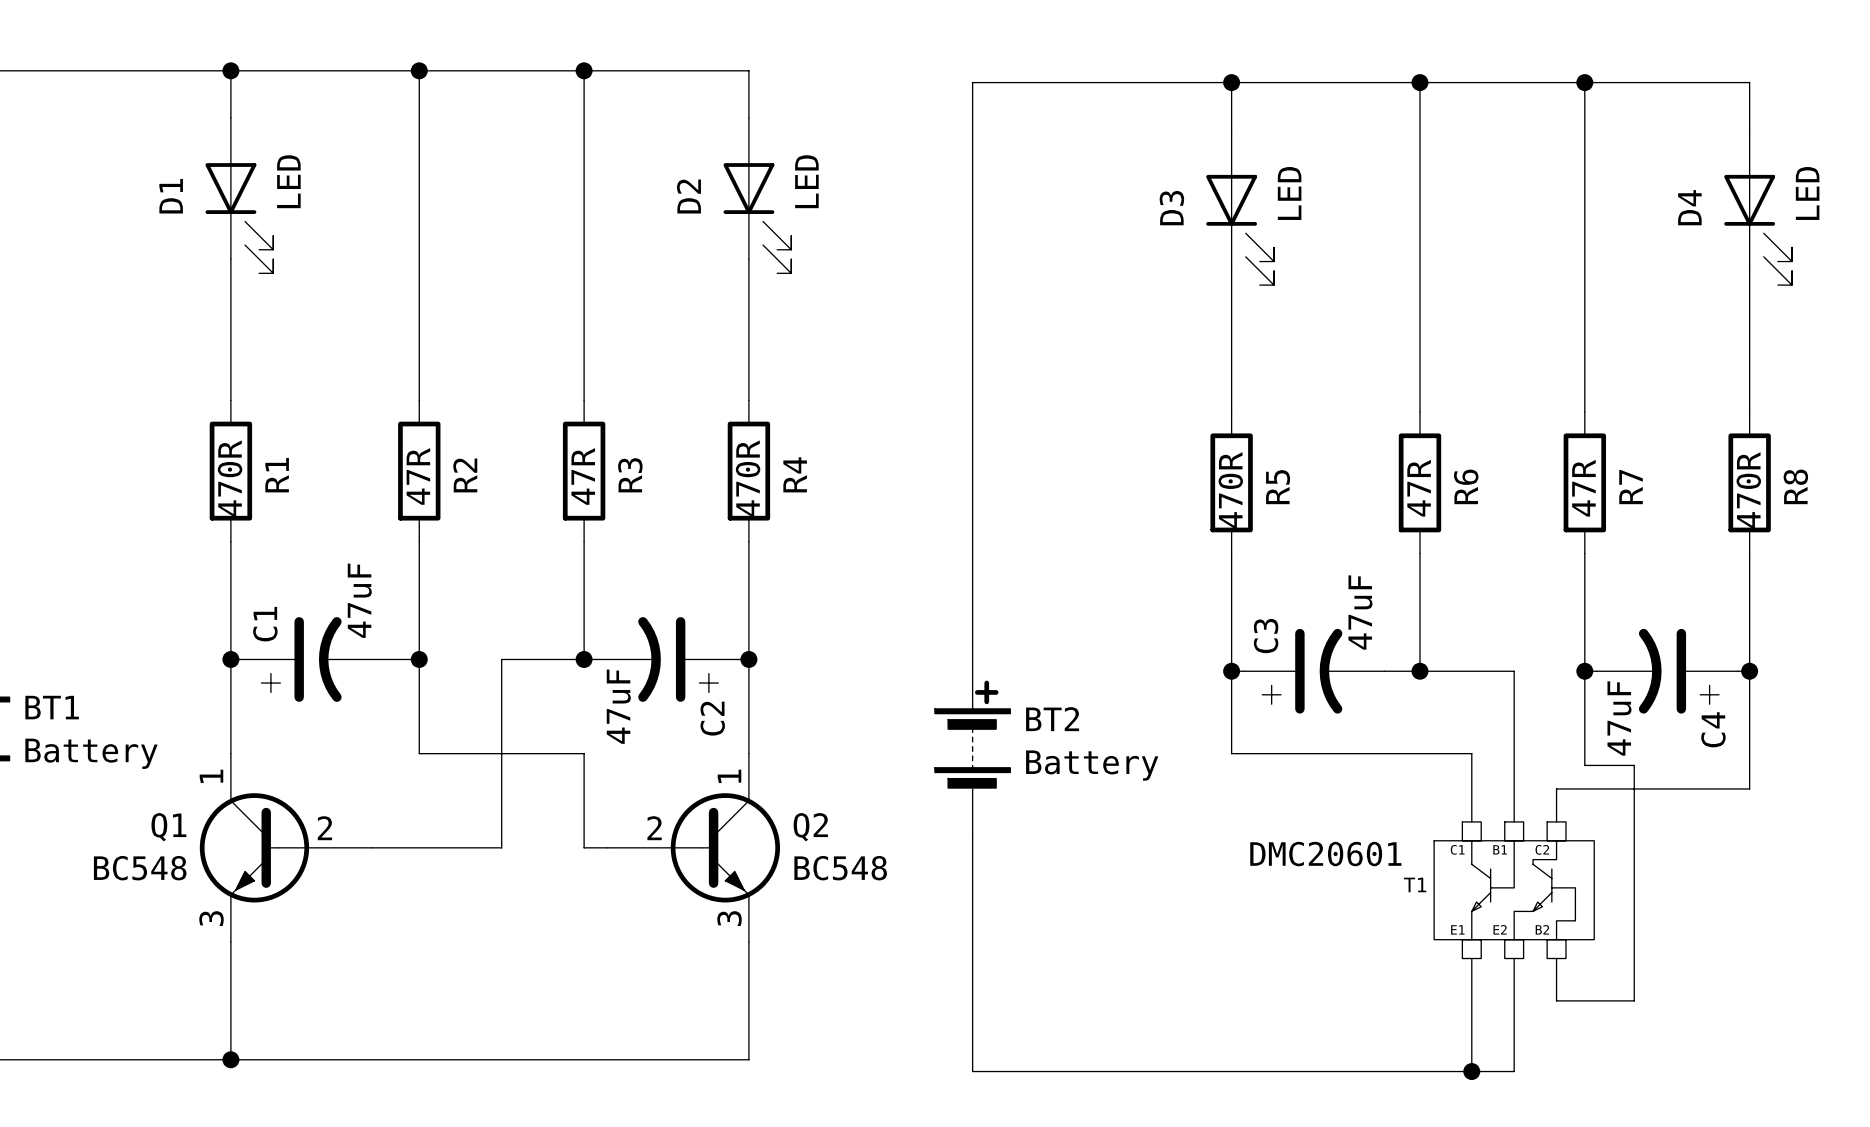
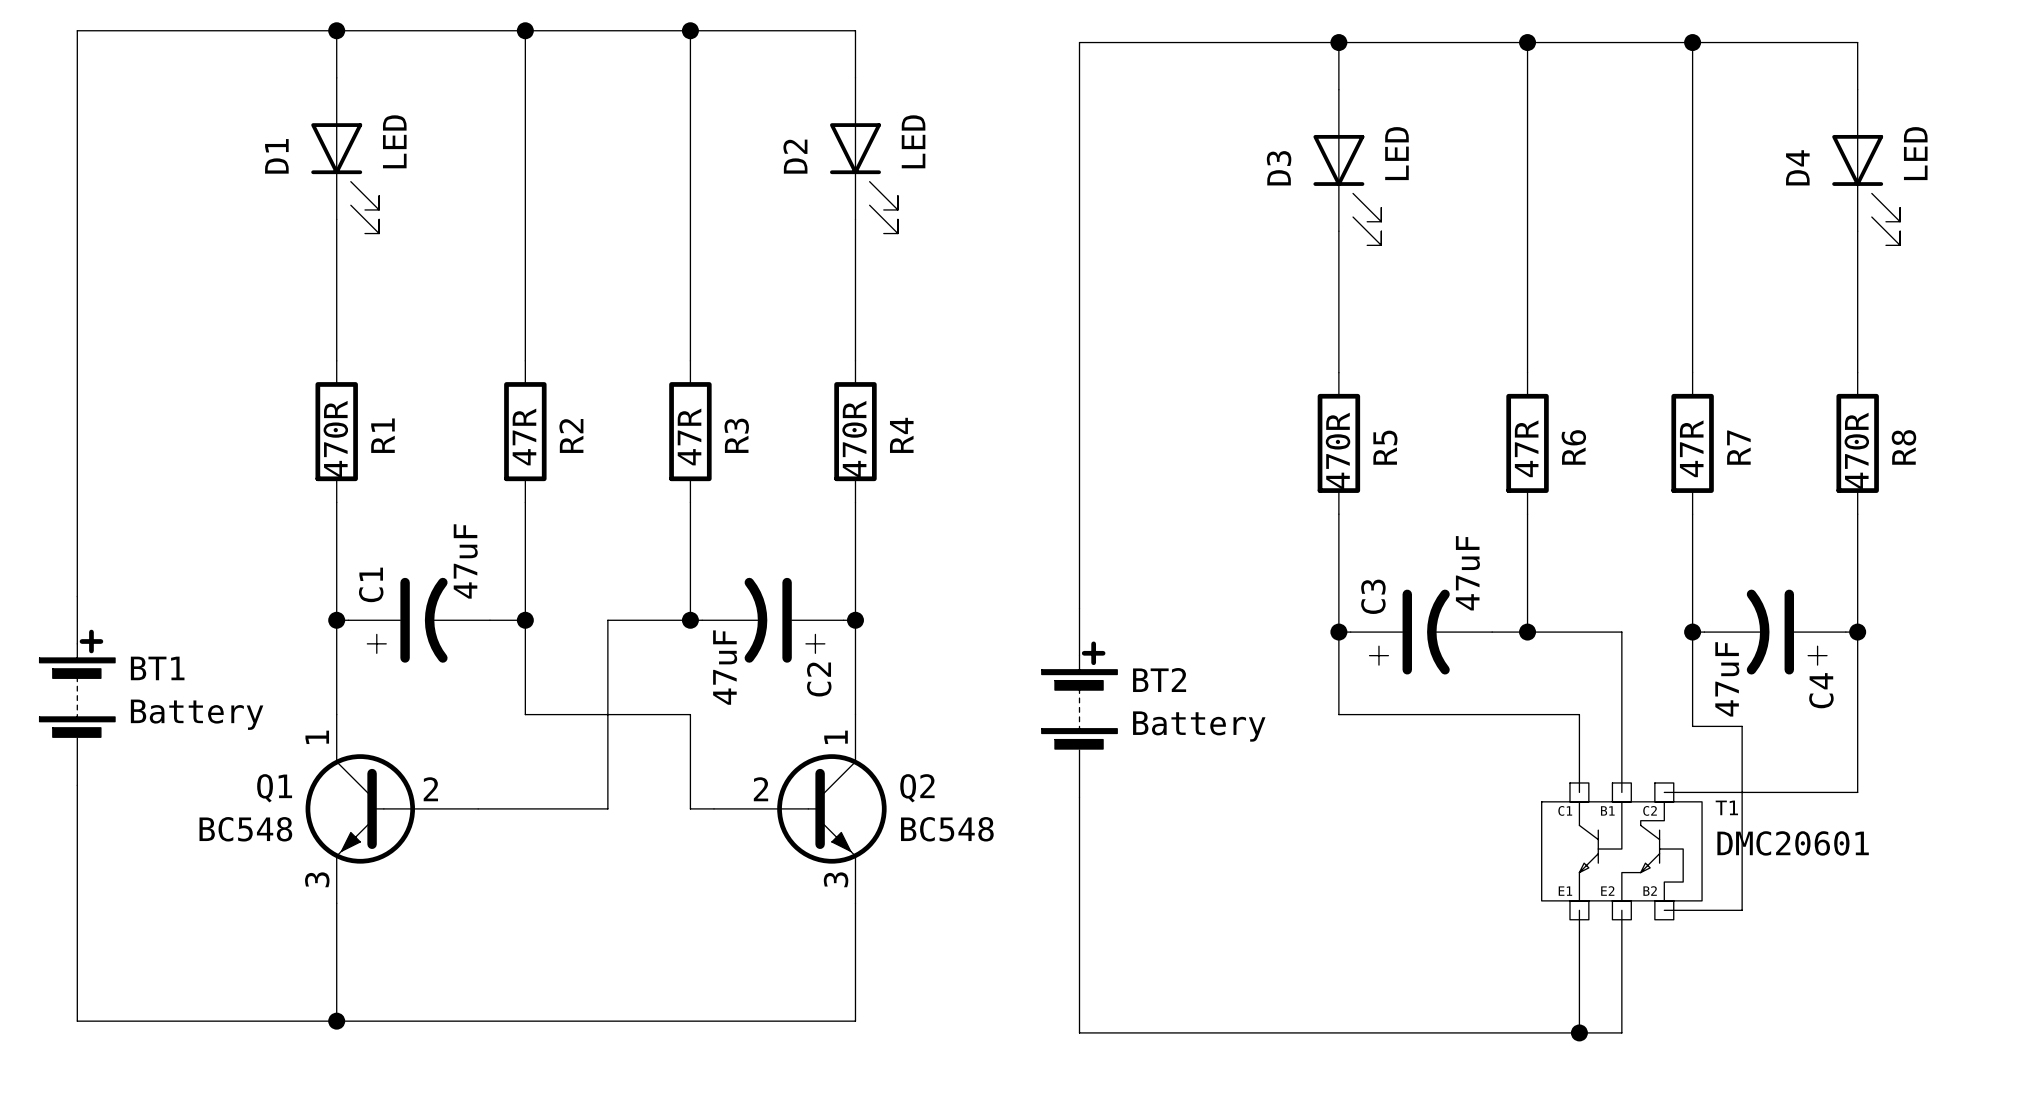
wire: (1749, 788) (1556, 788) (1556, 821) -> (1857, 749) (1857, 792) (1664, 792)
wire: none -> (1579, 782) (1579, 792)
wire: none -> (1621, 782) (1621, 792)
T1 value position: DMC20601 (1325, 854) -> DMC20601 (1793, 843)
T1 name position: T1 (1415, 884) -> T1 (1726, 807)
wire: none -> (1579, 910) (1579, 919)
wire: none -> (1621, 910) (1621, 919)
wire: (1634, 949) (1634, 1000) (1556, 1000) (1556, 958) -> (1742, 910) (1664, 910)

